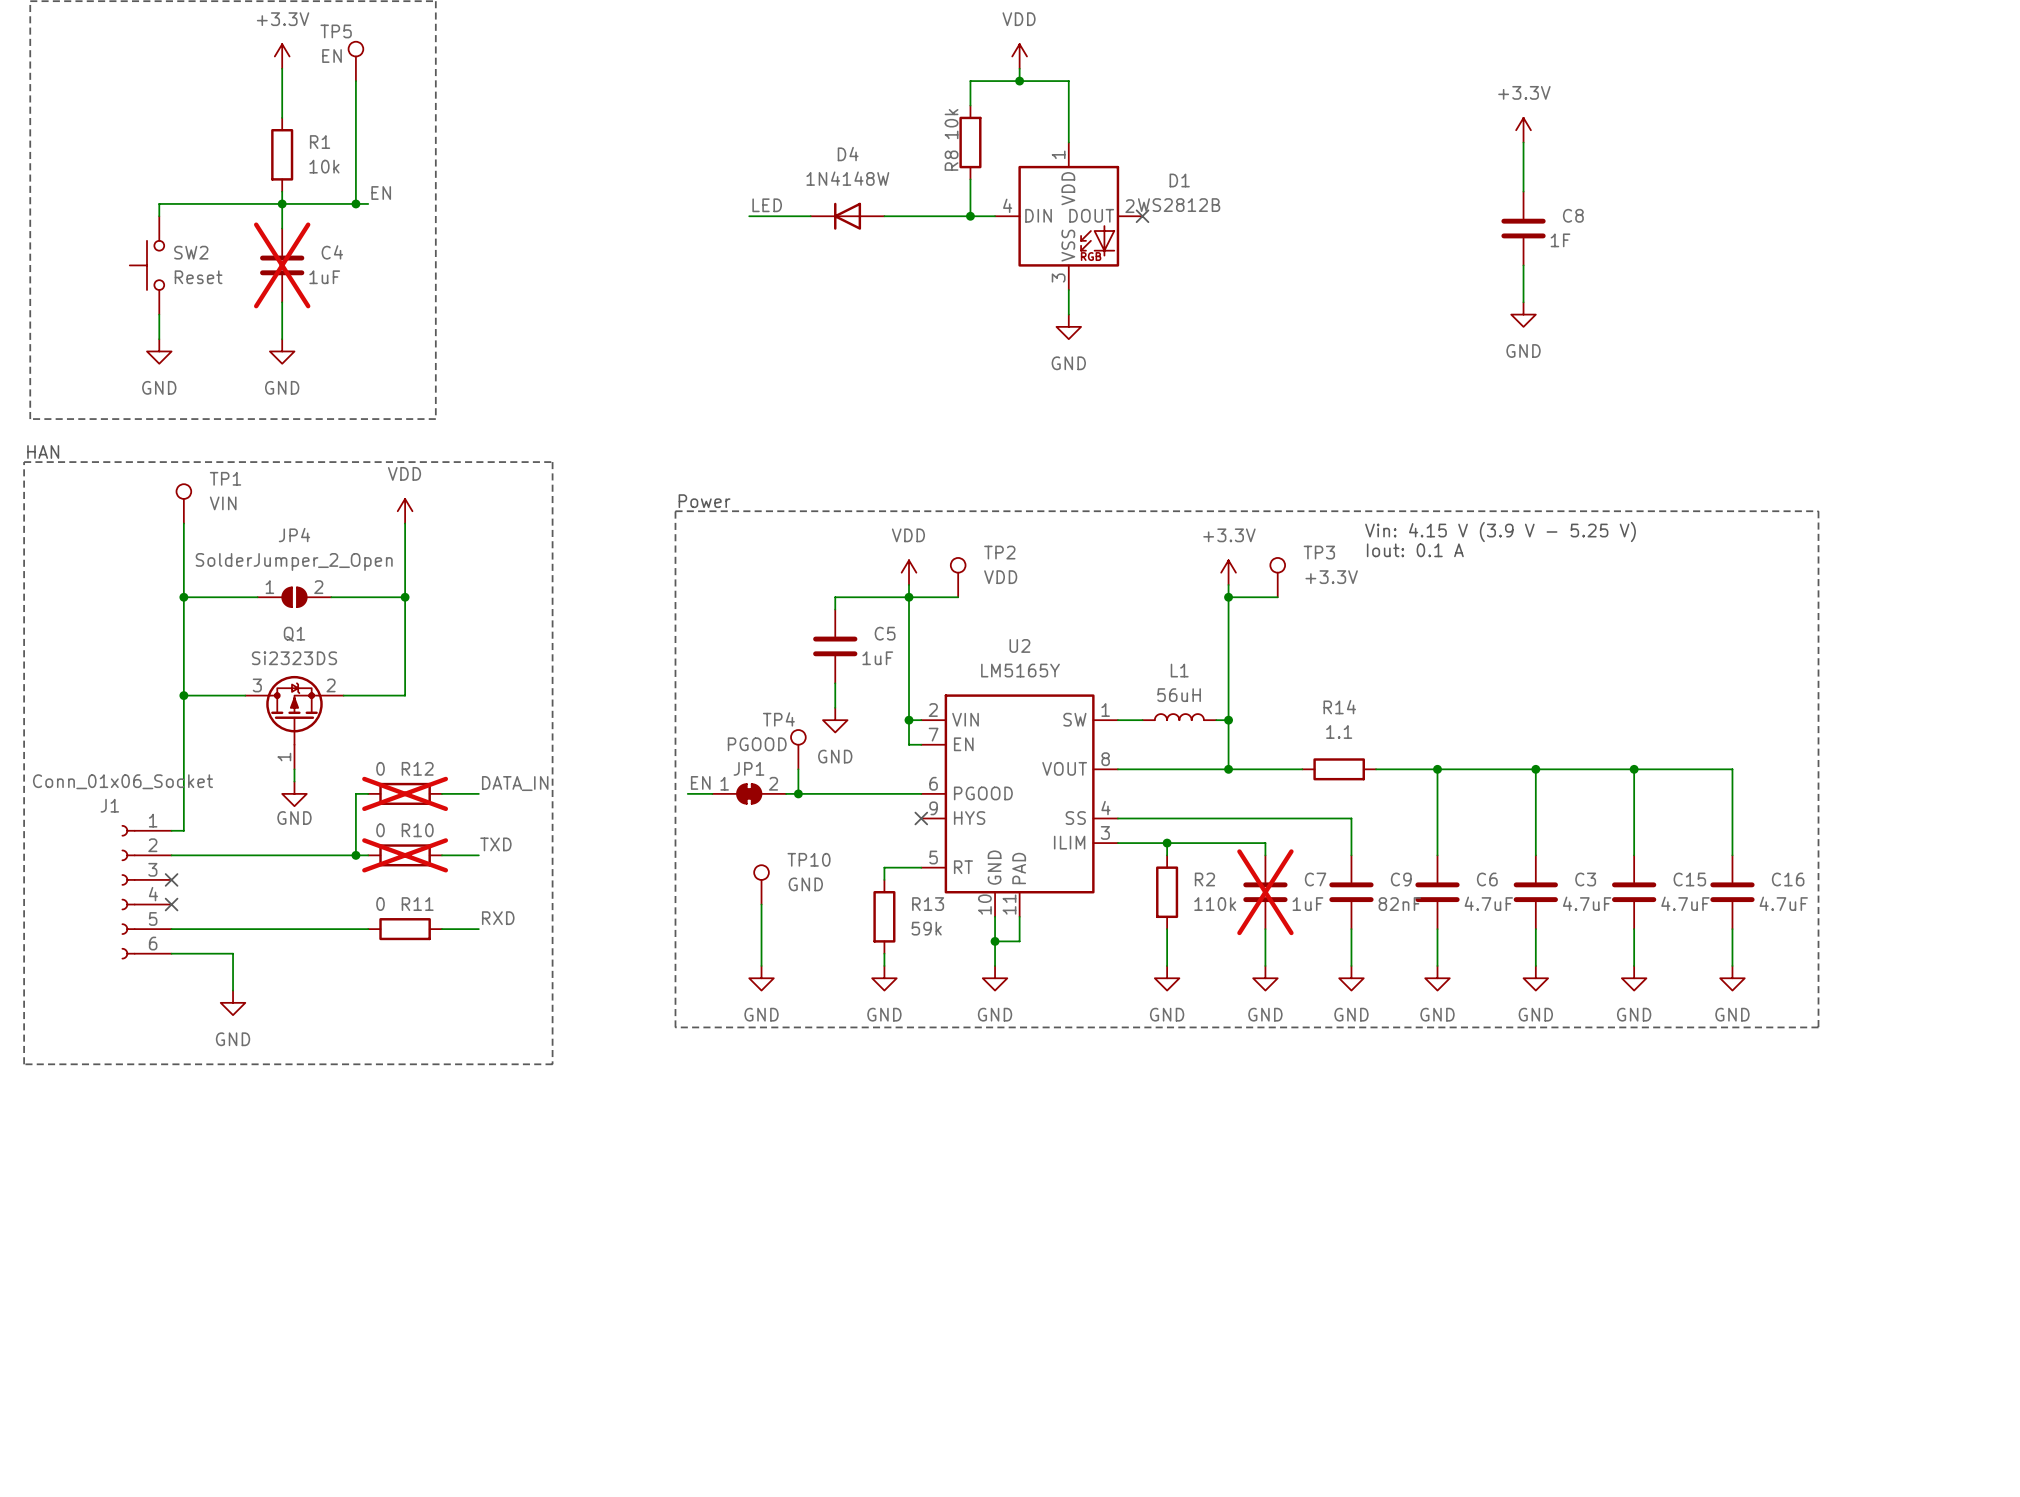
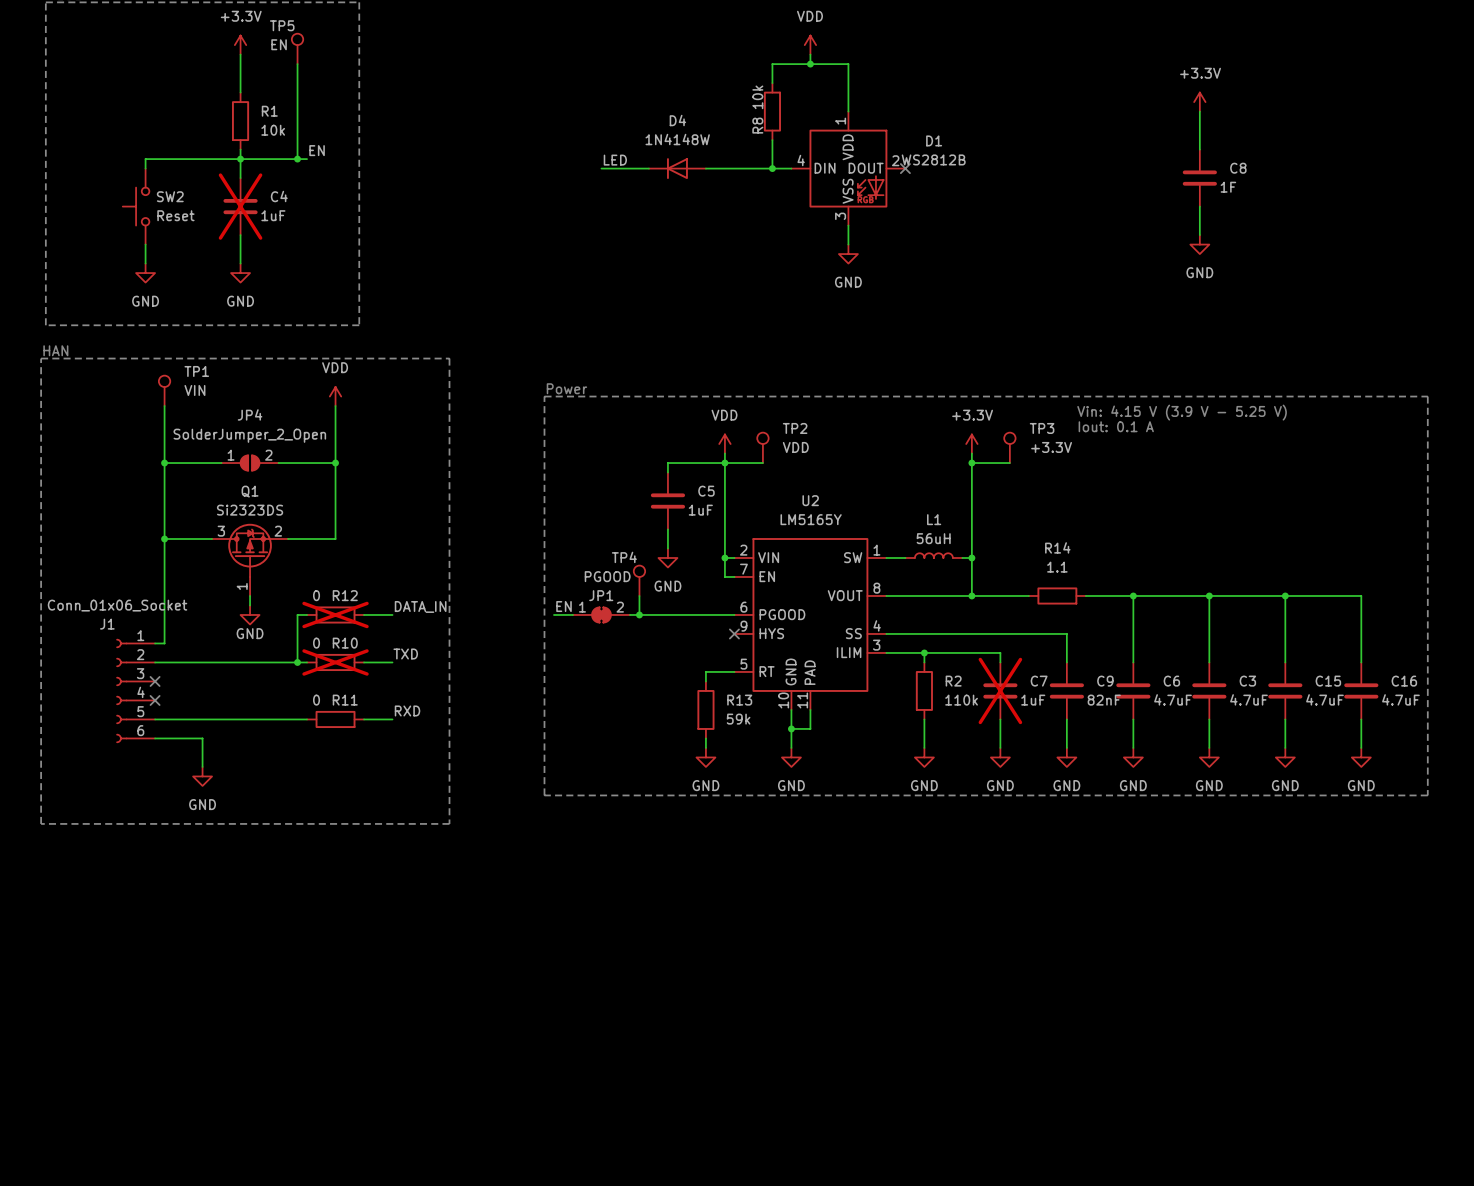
TP10: GND (761, 884) -> none
wire: (761, 904) (761, 965) -> none
power symbol: GND (761, 978) -> none

